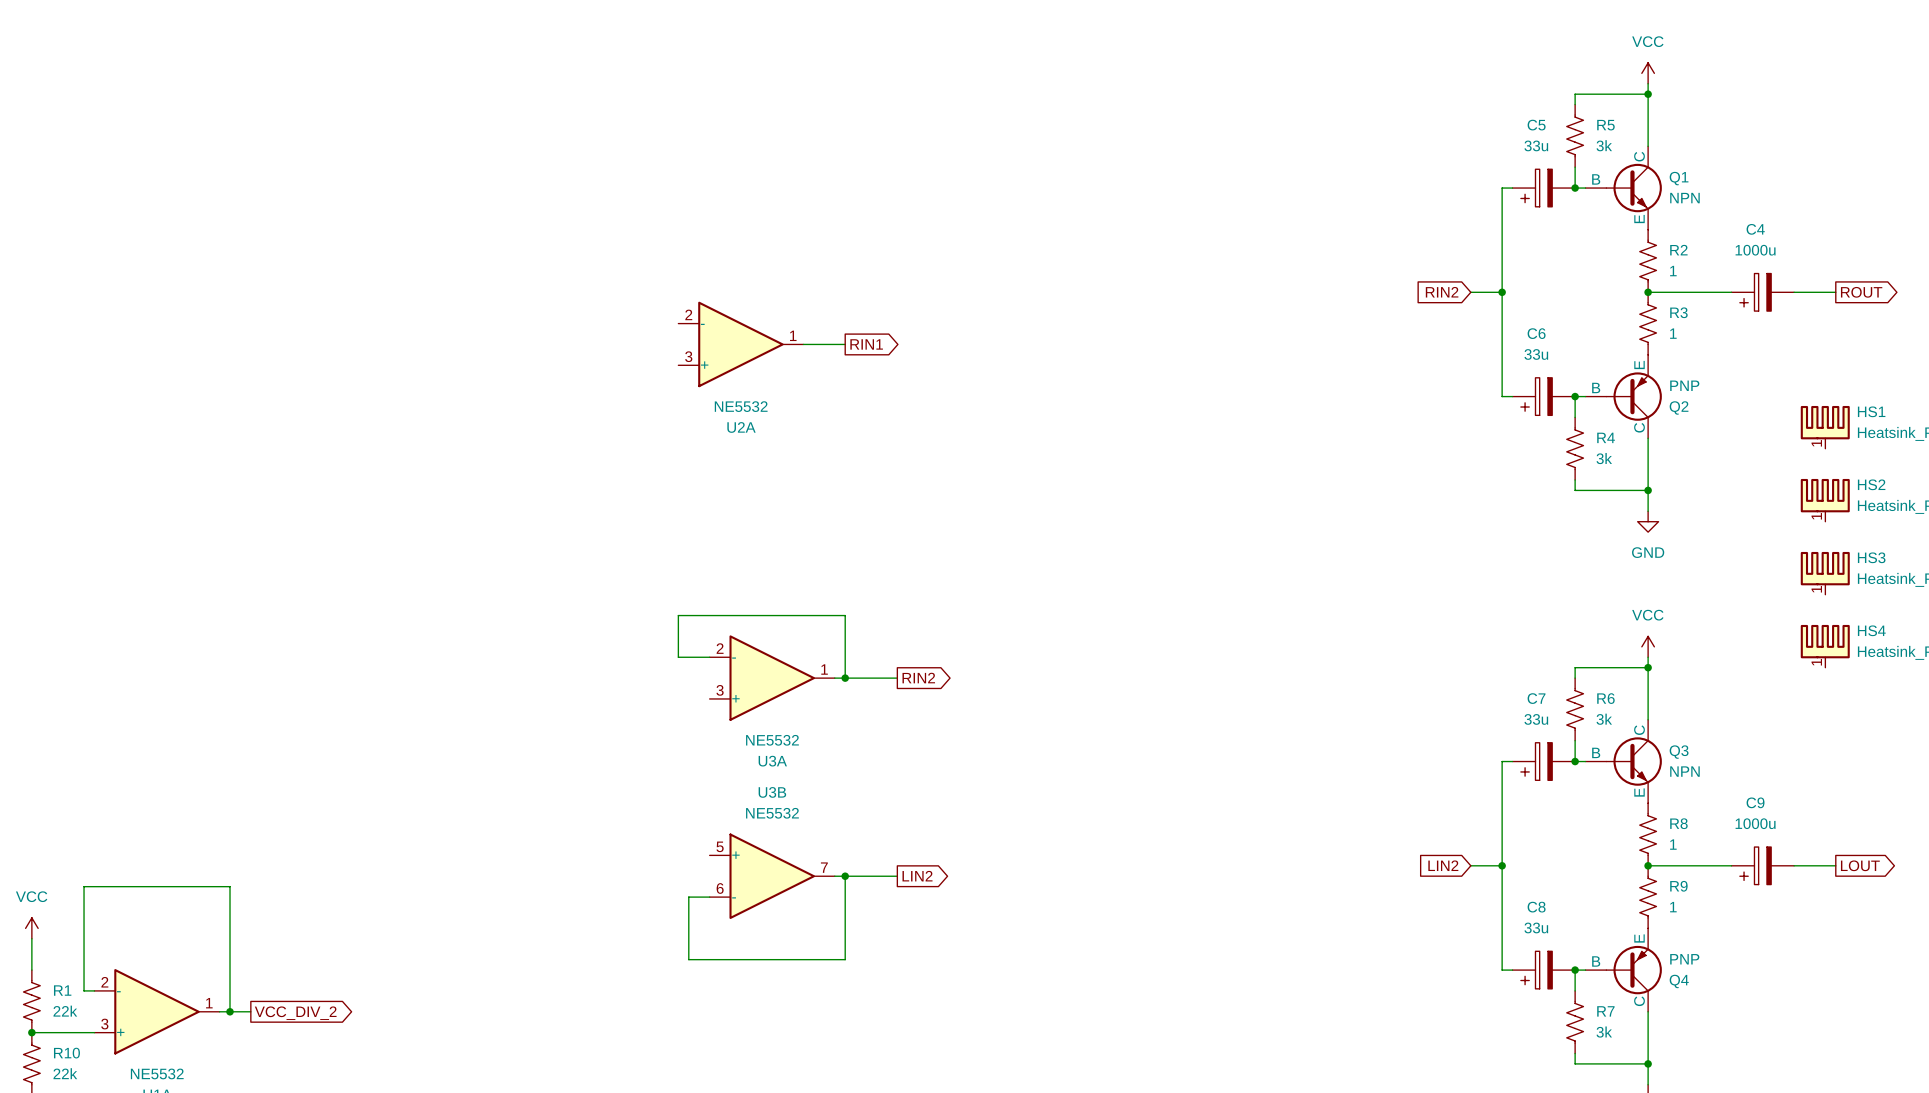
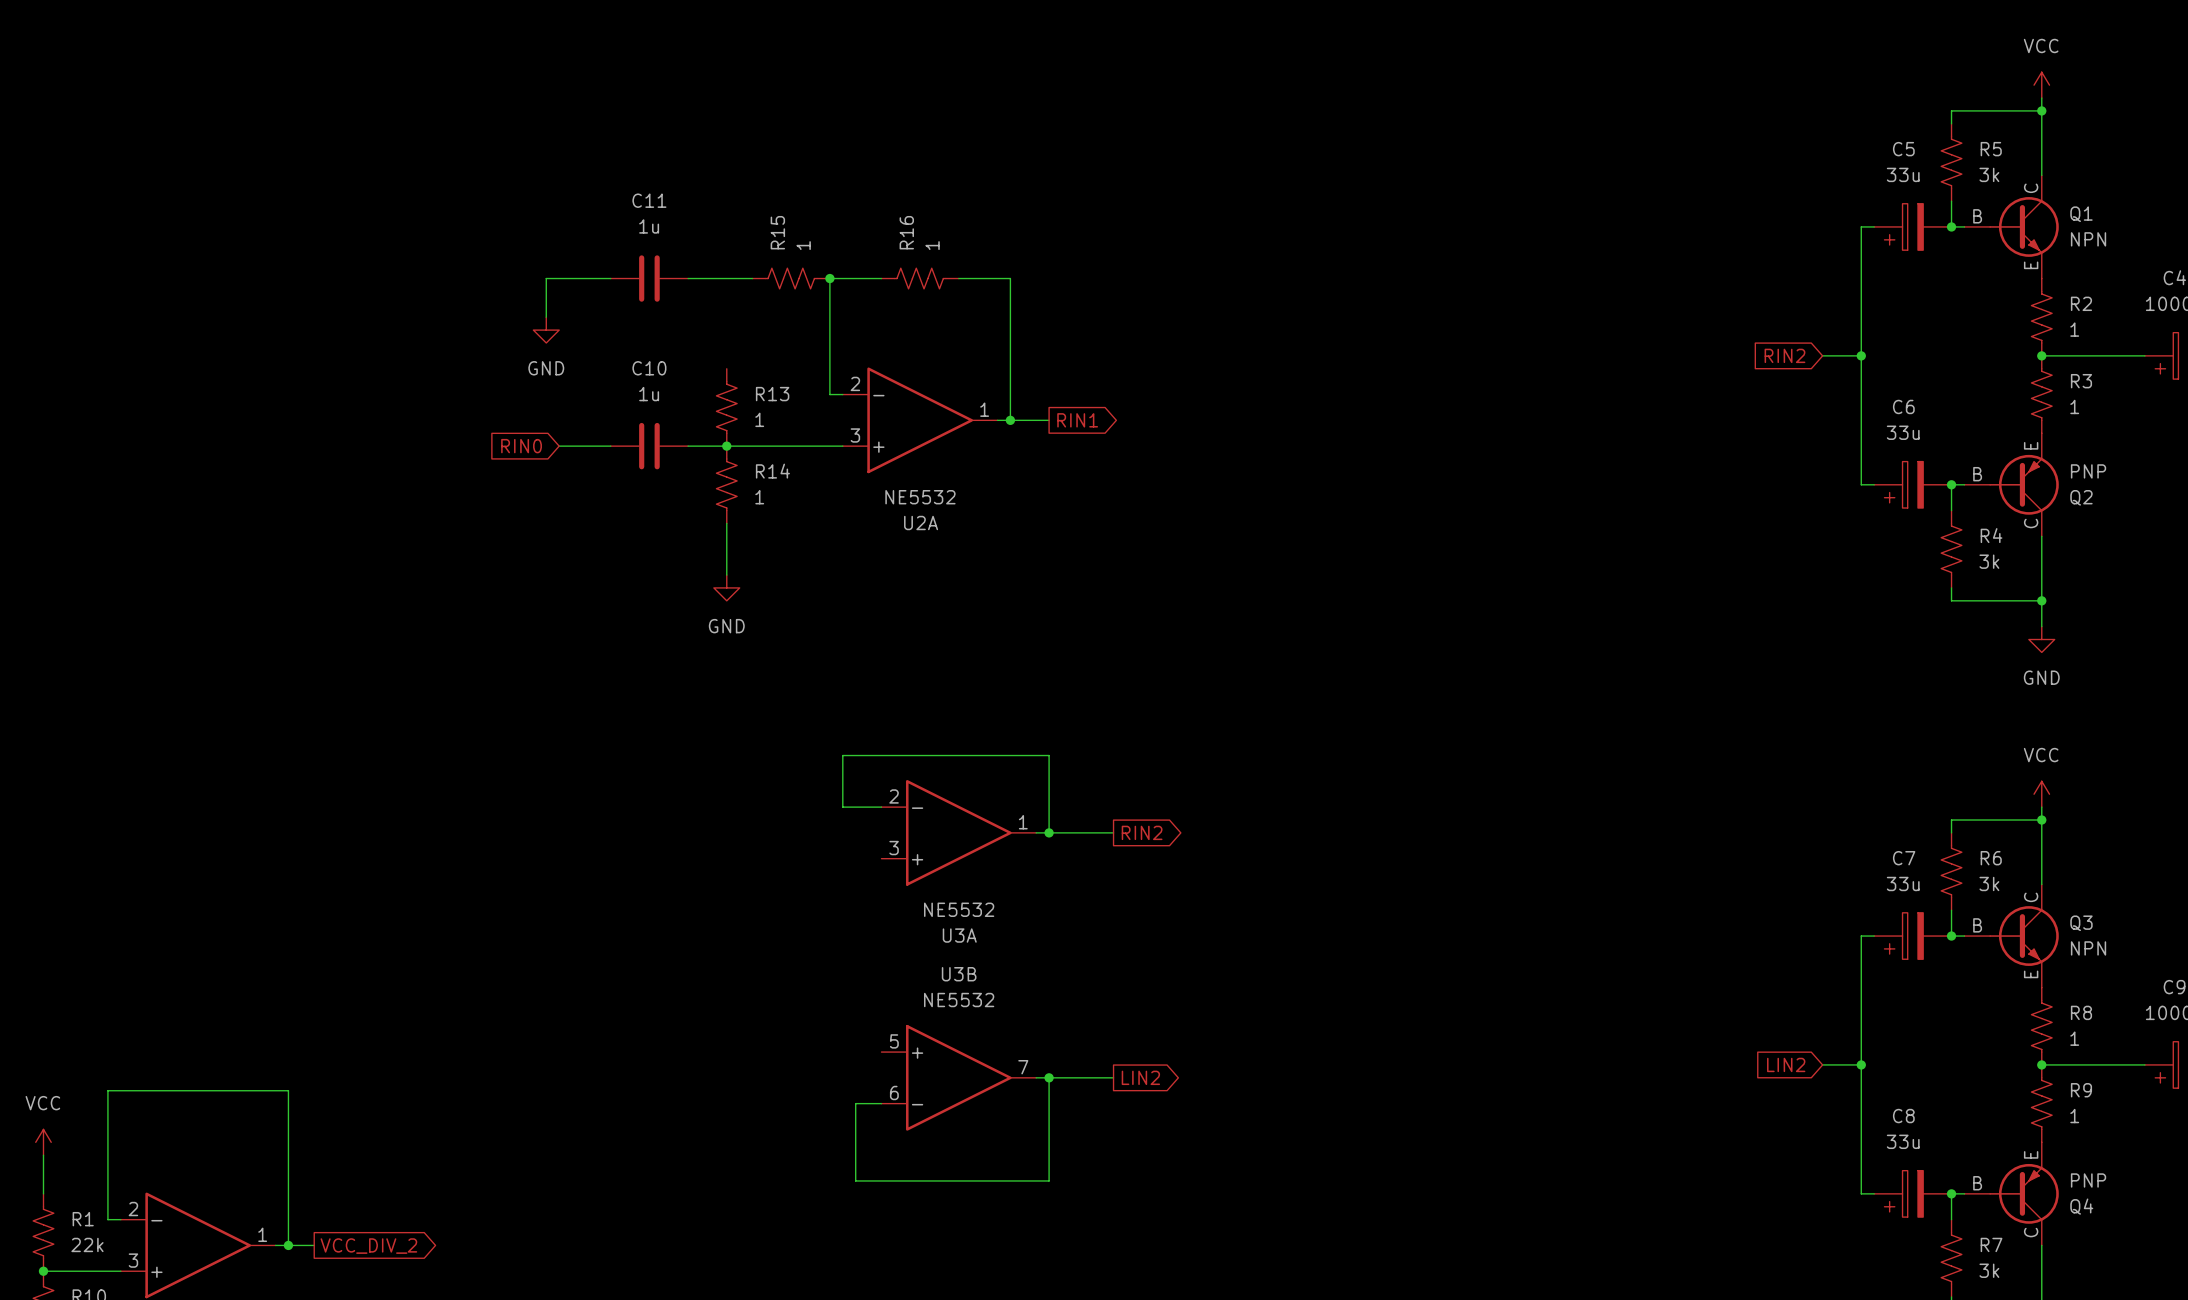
wire: none -> (610, 278) (546, 278) (546, 317)
C11: none -> 1u (649, 278)
wire: none -> (688, 278) (752, 278)
R15: none -> 1 (791, 278)
junction: none -> (829, 278)
wire: none -> (881, 278) (829, 278) (829, 394) (842, 394)
R16: none -> 1 (920, 278)
wire: none -> (958, 278) (1010, 278) (1010, 420)
power symbol: none -> GND (546, 330)
R13: none -> 1 (726, 407)
junction: none -> (1010, 420)
global label: none -> RIN0 (521, 446)
wire: none -> (559, 446) (610, 446)
C10: none -> 1u (649, 446)
wire: none -> (688, 446) (842, 446)
junction: none -> (726, 446)
R14: none -> 1 (726, 484)
wire: none -> (726, 523) (726, 575)
power symbol: none -> GND (726, 587)

